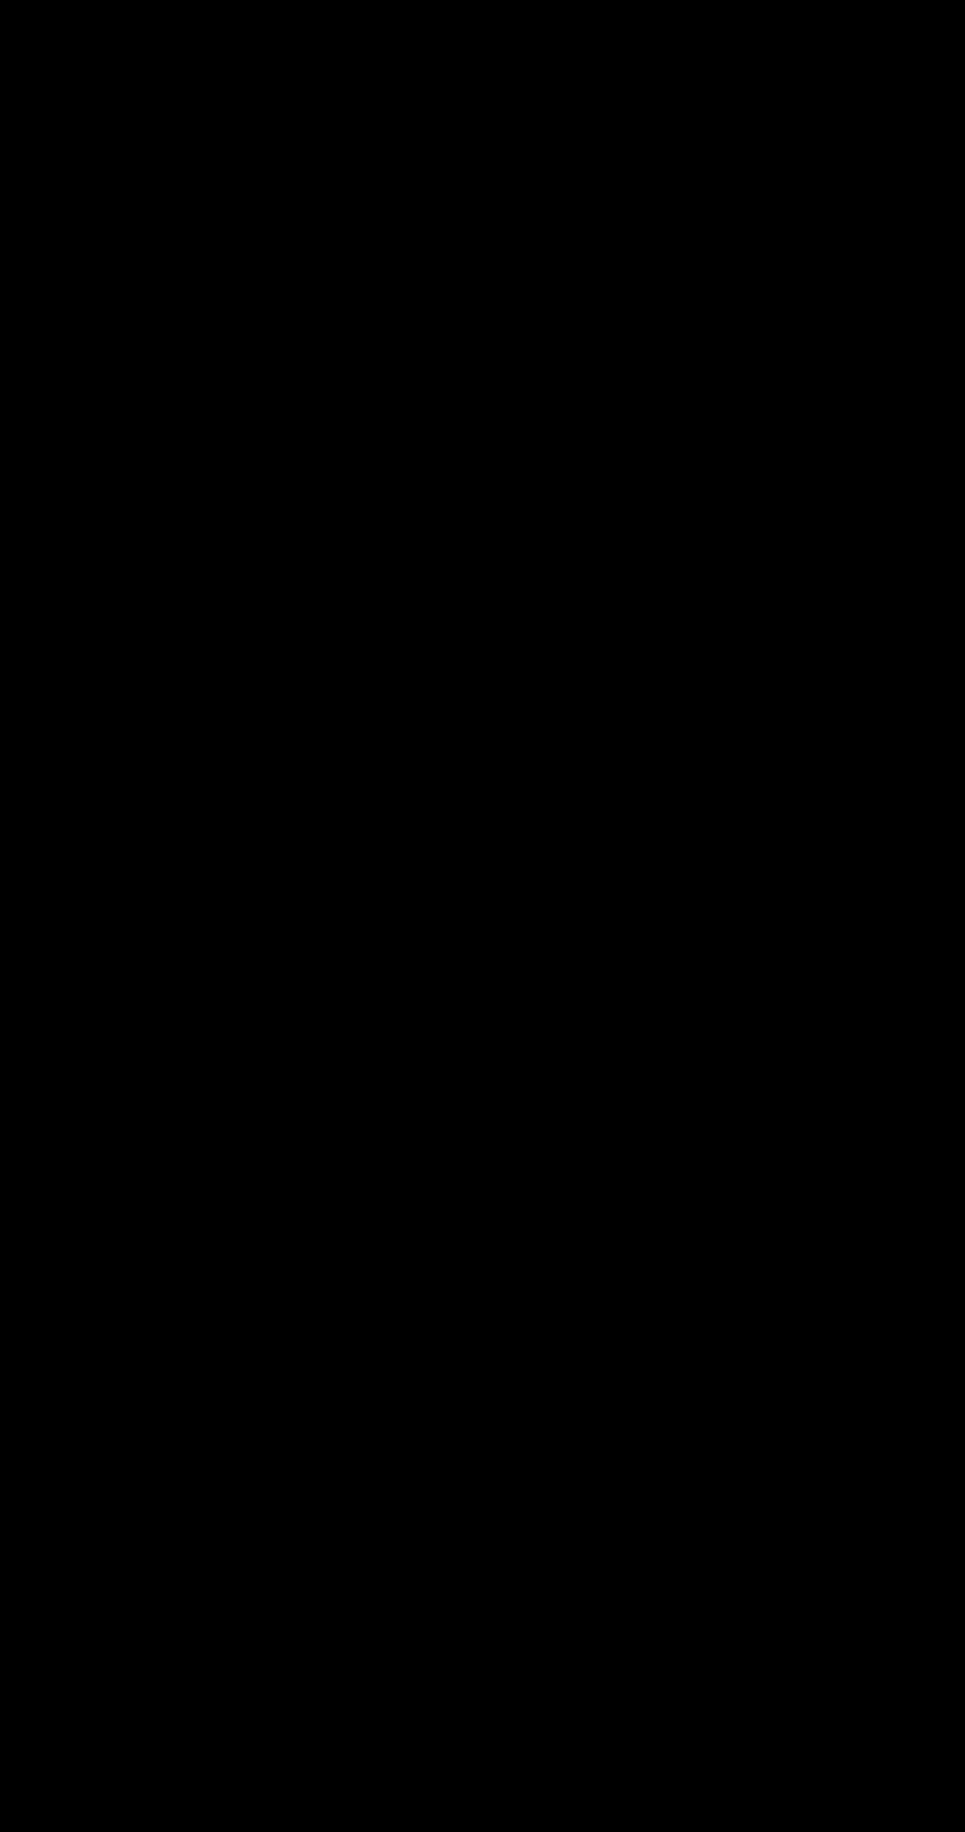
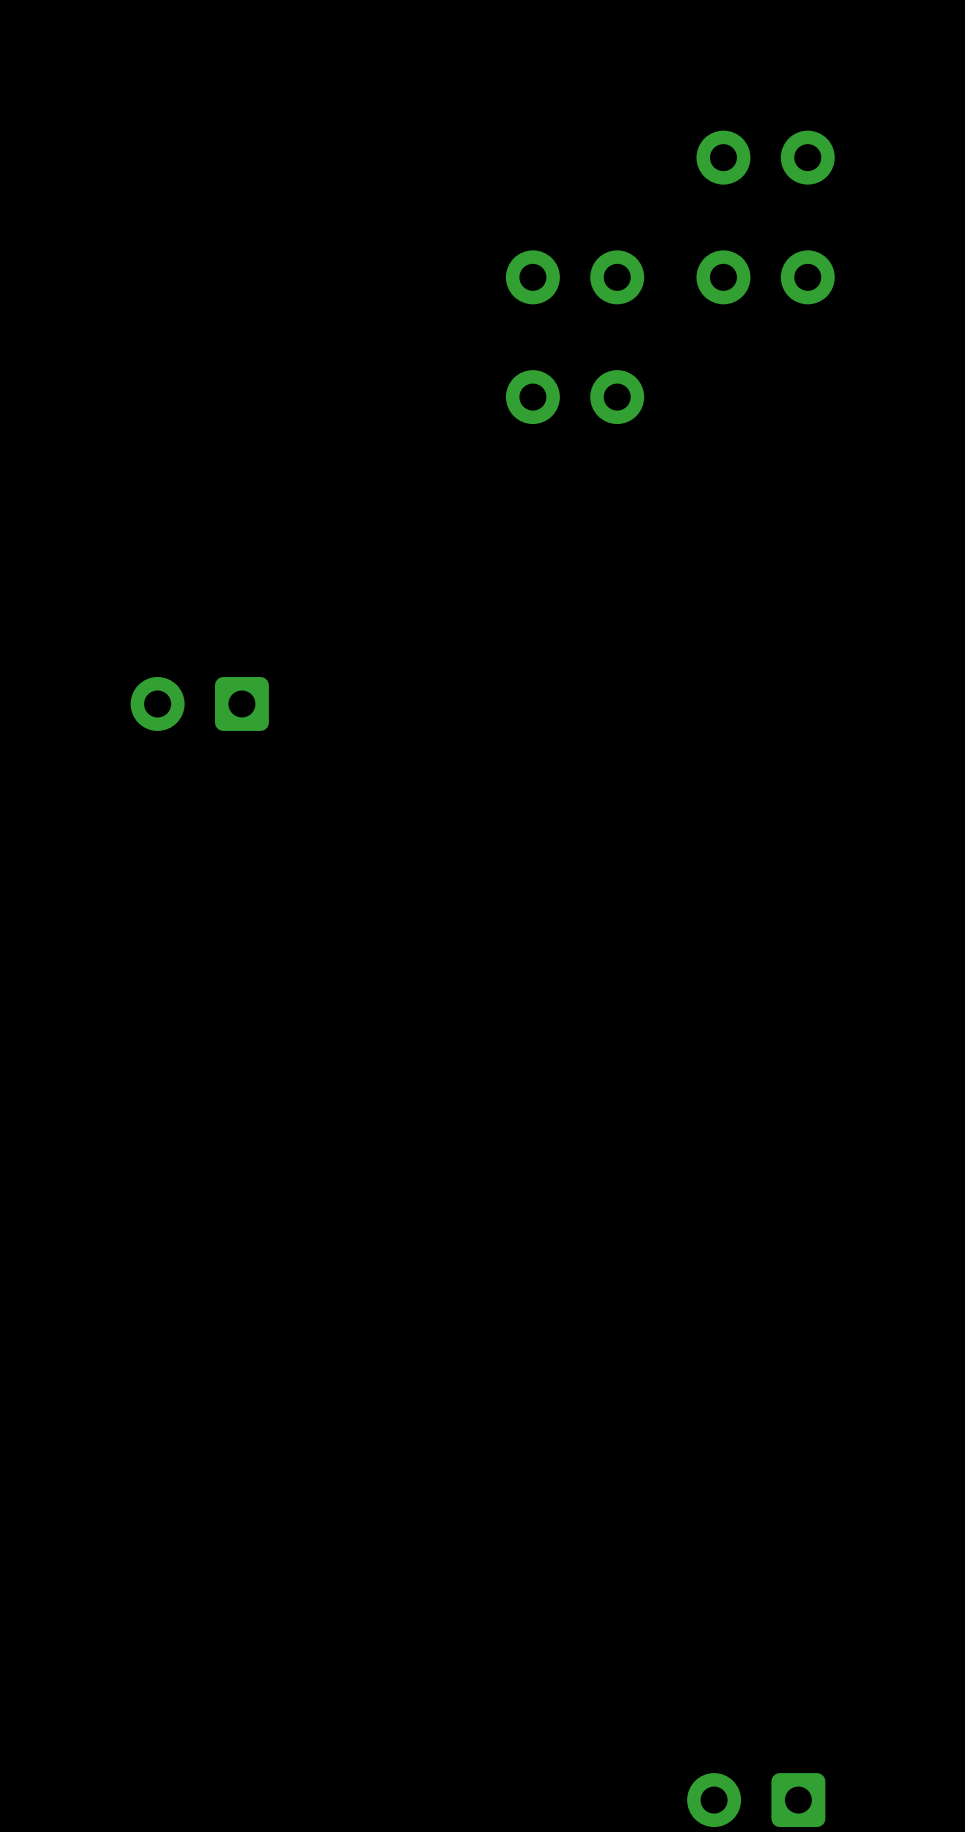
part: none -> (765, 157)
part: none -> (575, 277)
part: none -> (765, 277)
part: none -> (575, 397)
part: none -> (199, 703)
part: none -> (756, 1800)

